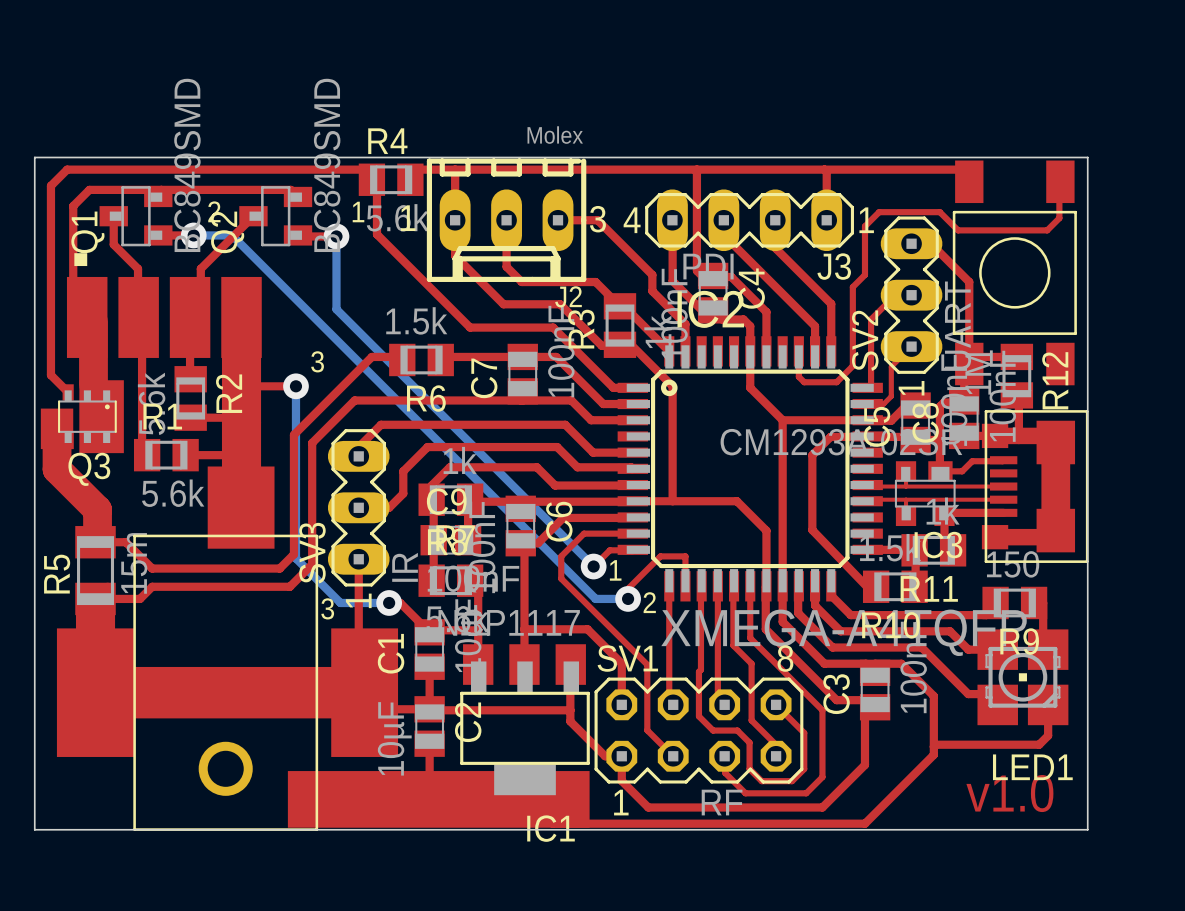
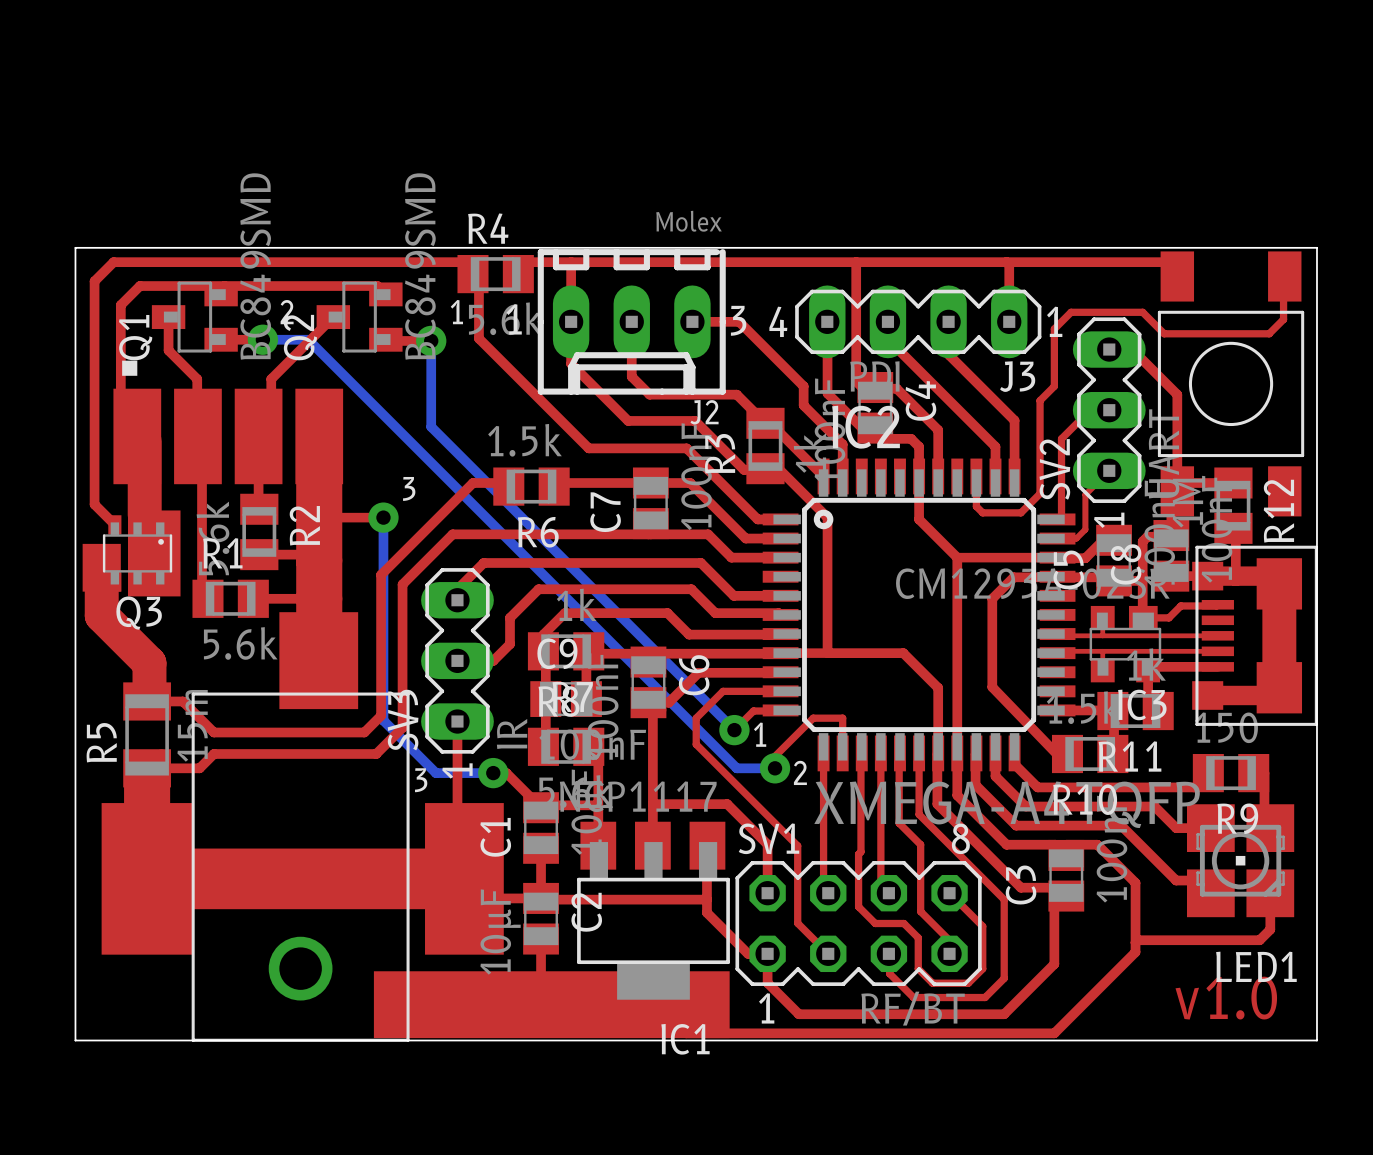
SV1 value: RF (722, 802) -> RF/BT (913, 1008)

